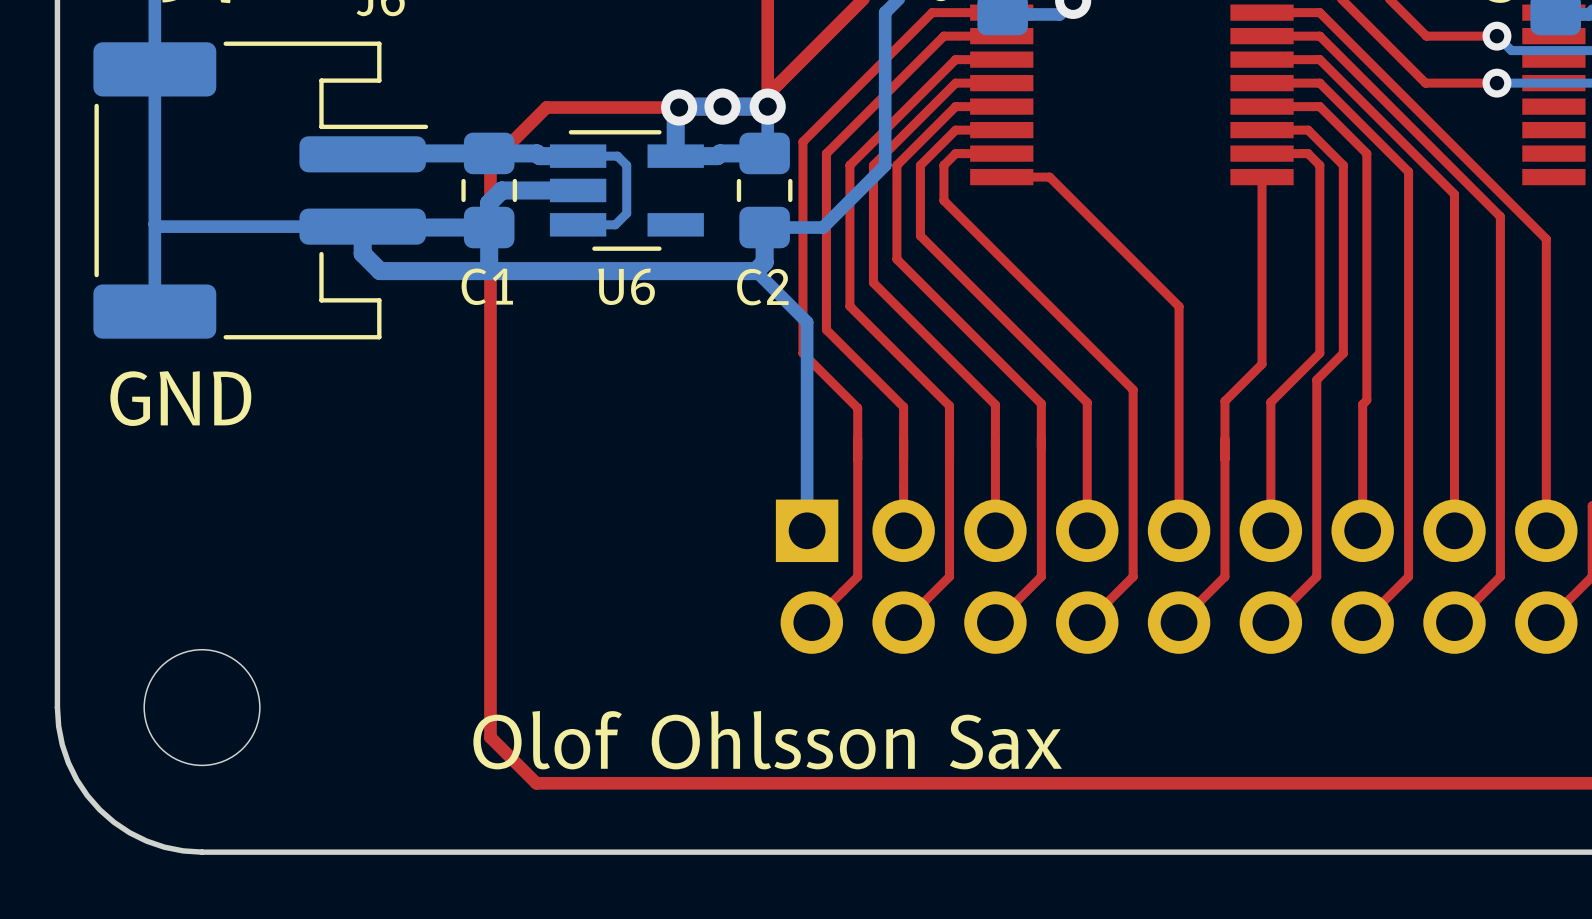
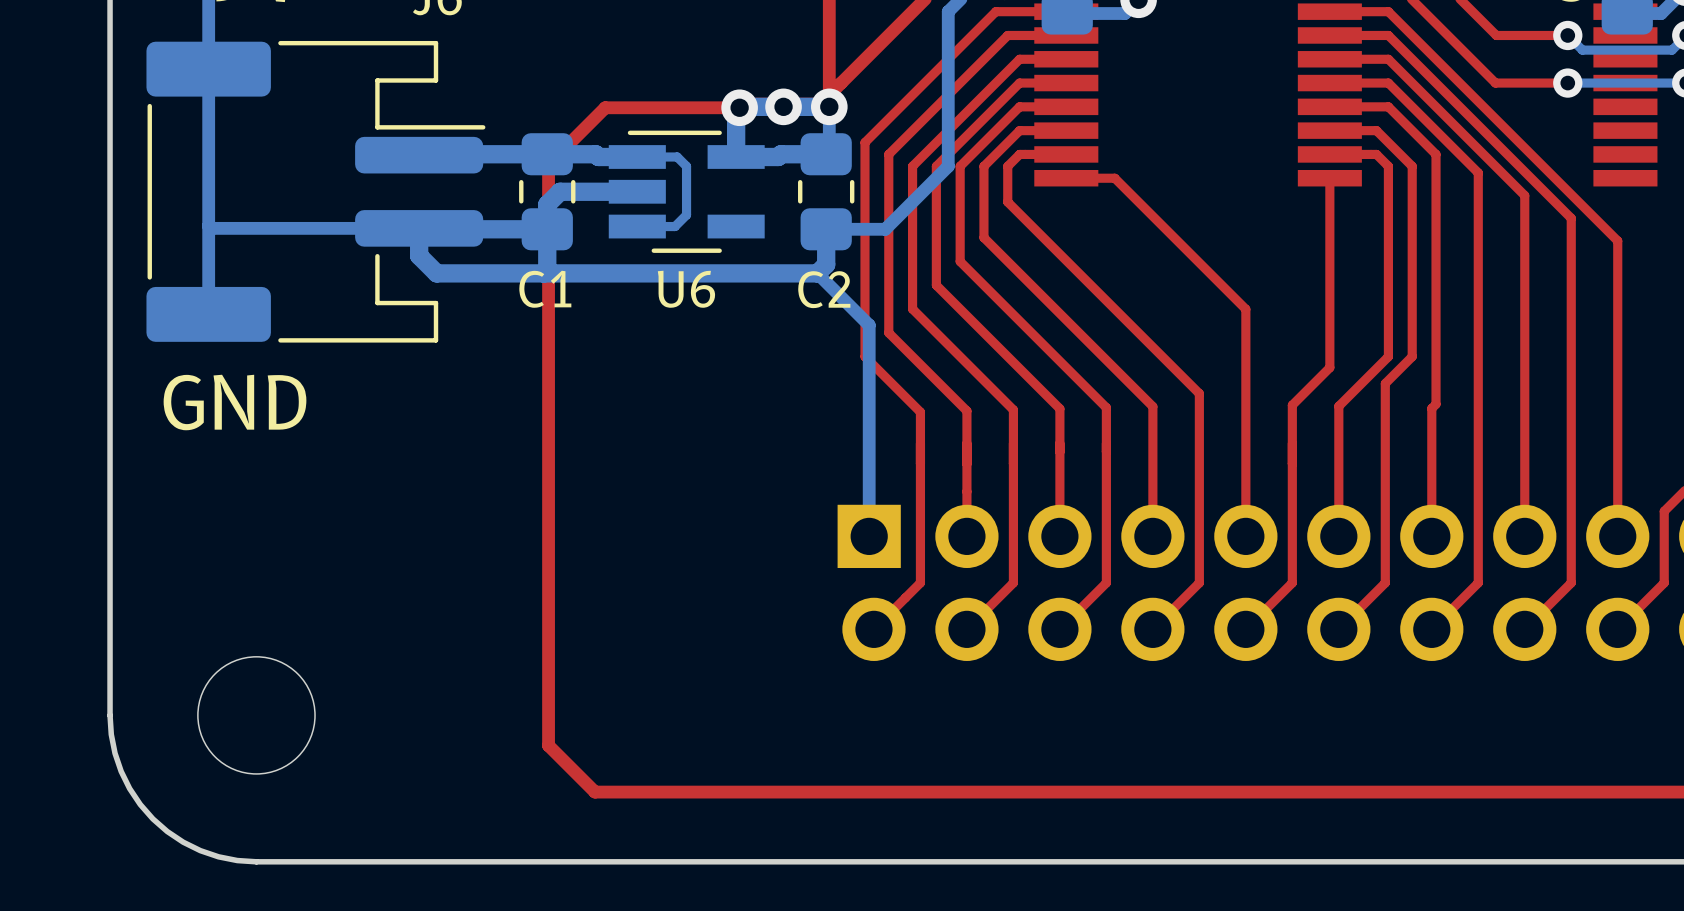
text: Olof Ohlsson Sax (767, 740) -> none

